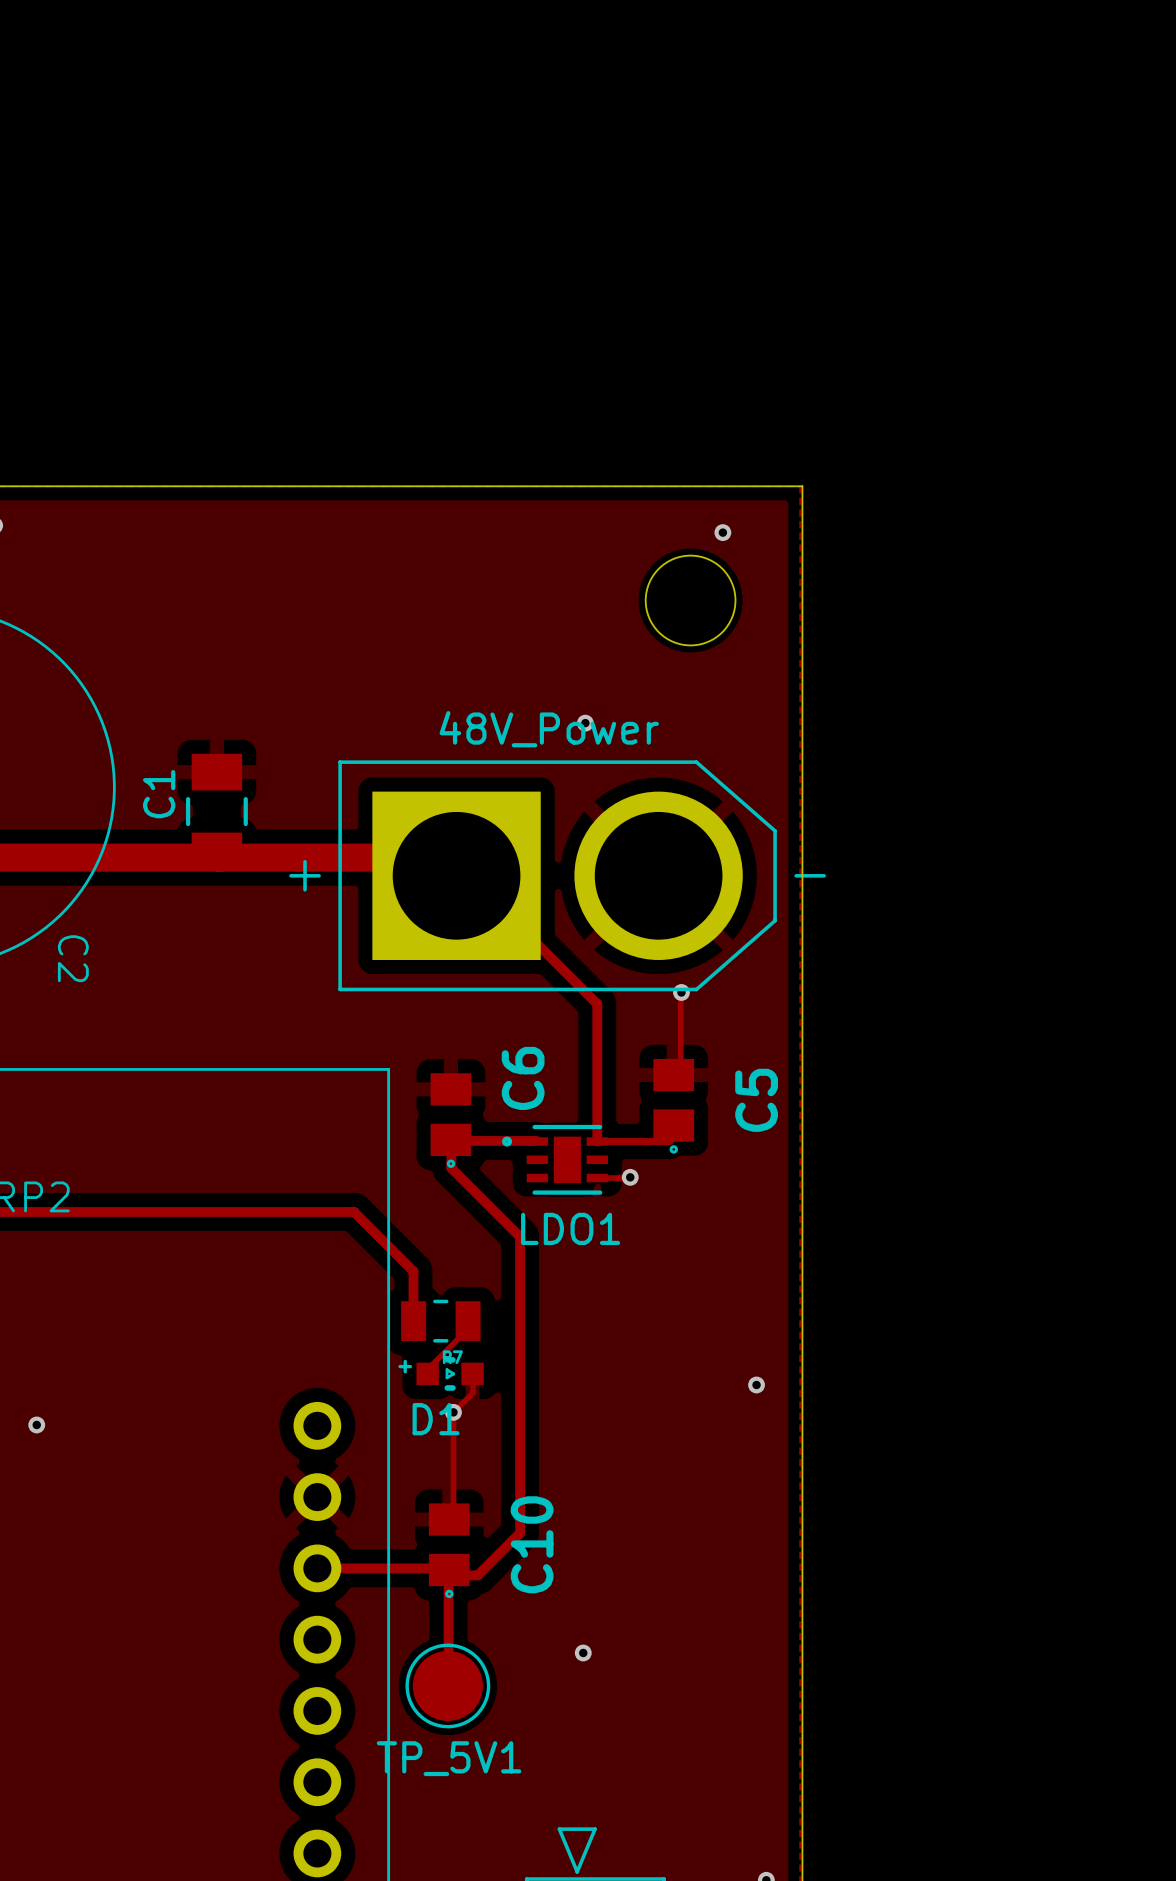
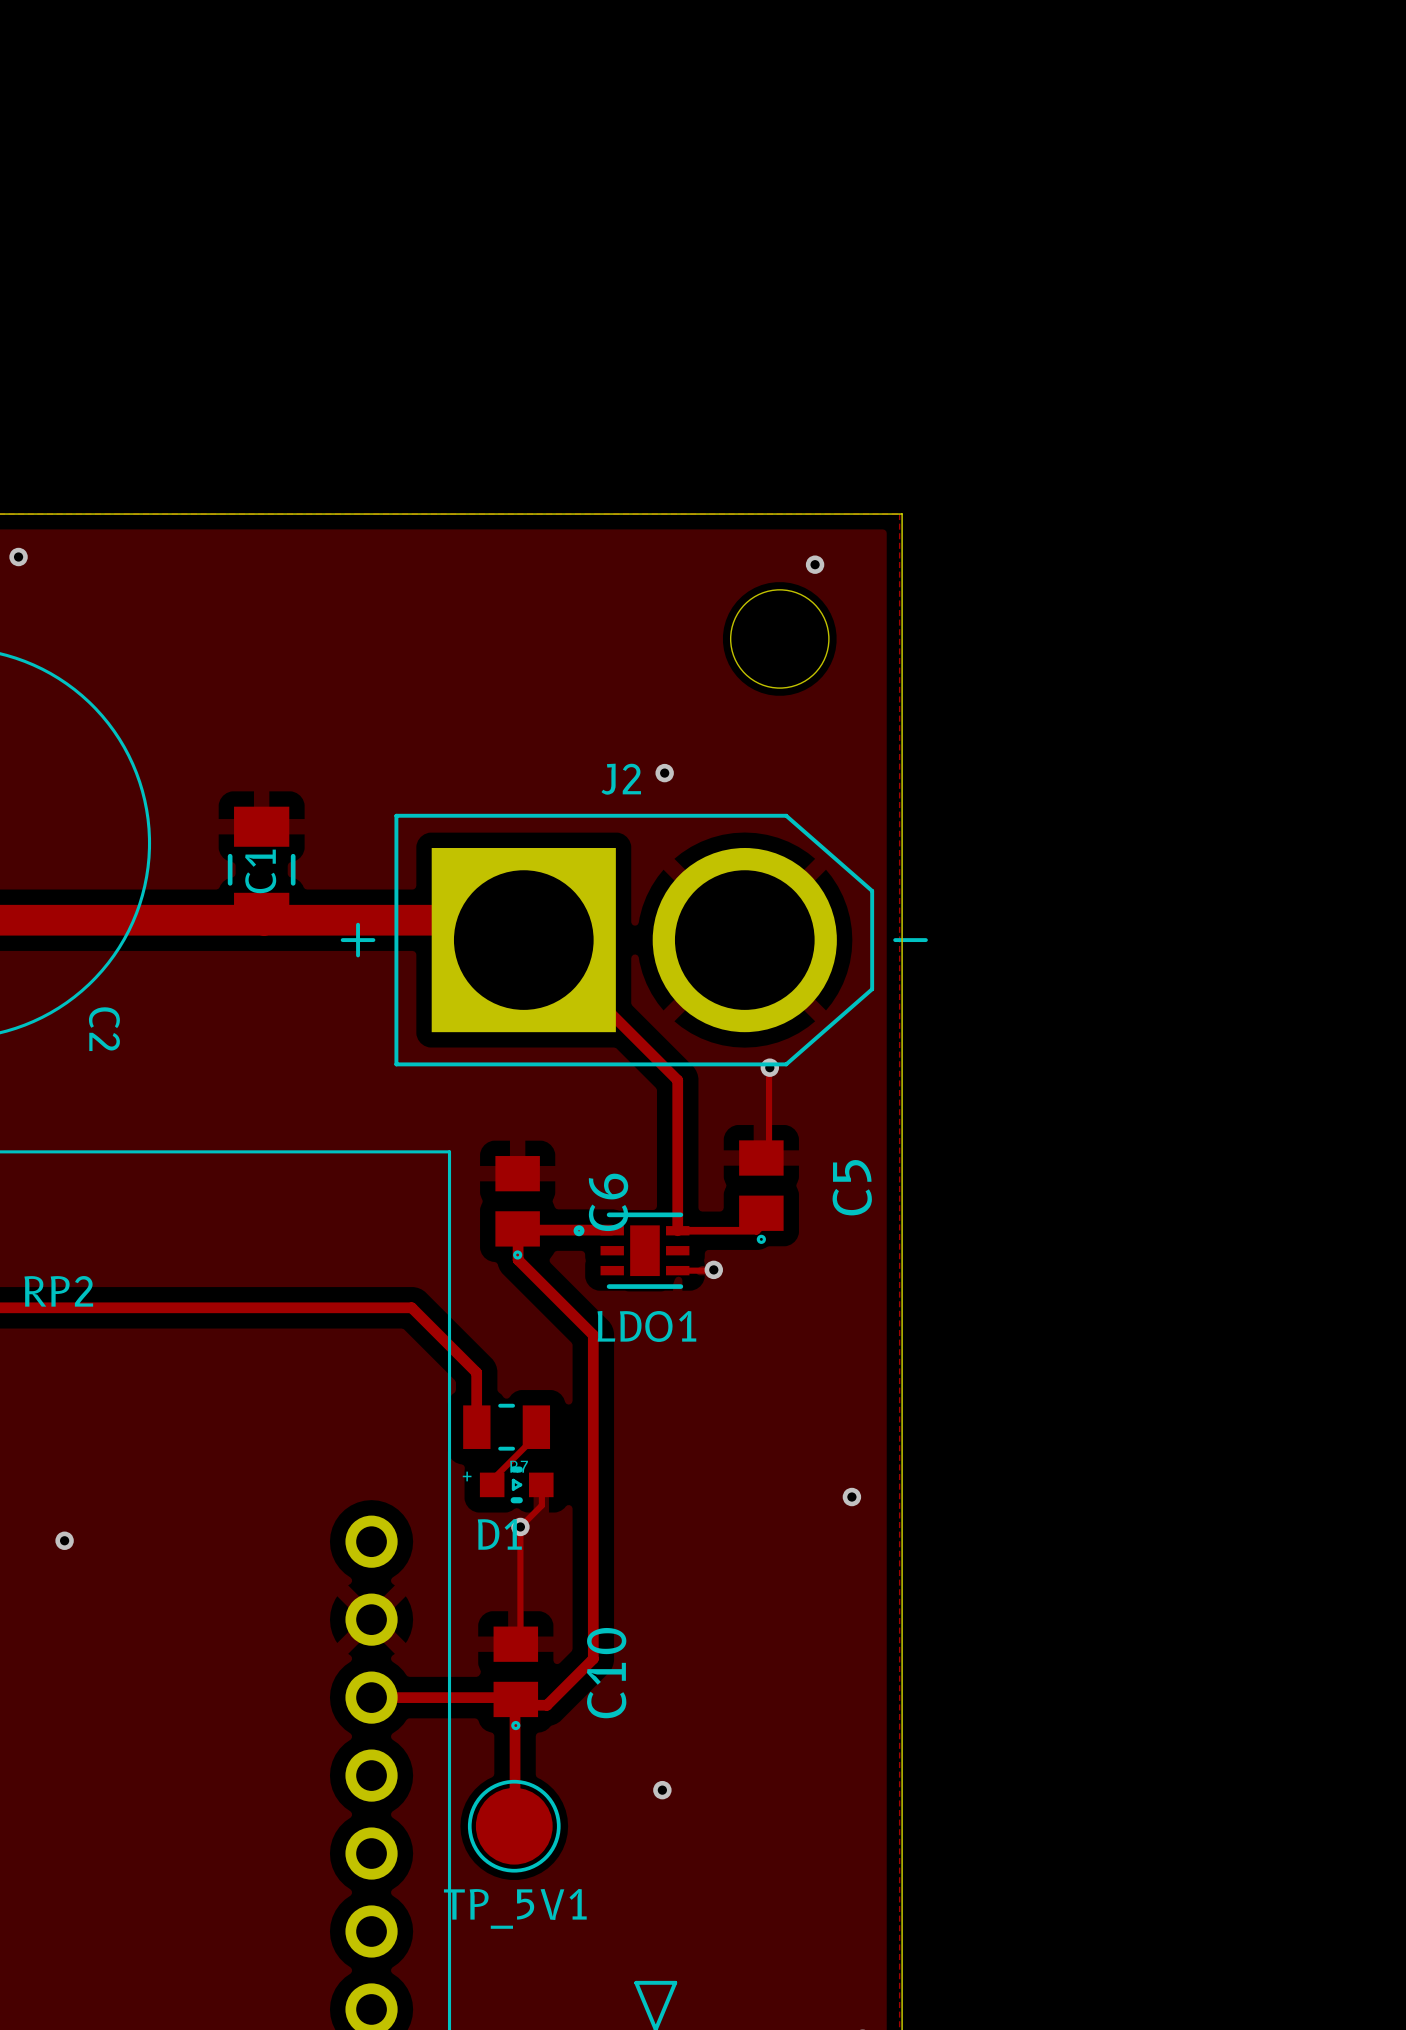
48V_Power name: 48V_Power (549, 729) -> J2 (621, 779)
C1 name position: C1 (159, 794) -> C1 (260, 871)
C6 name position: C6 (523, 1078) -> C6 (608, 1202)

